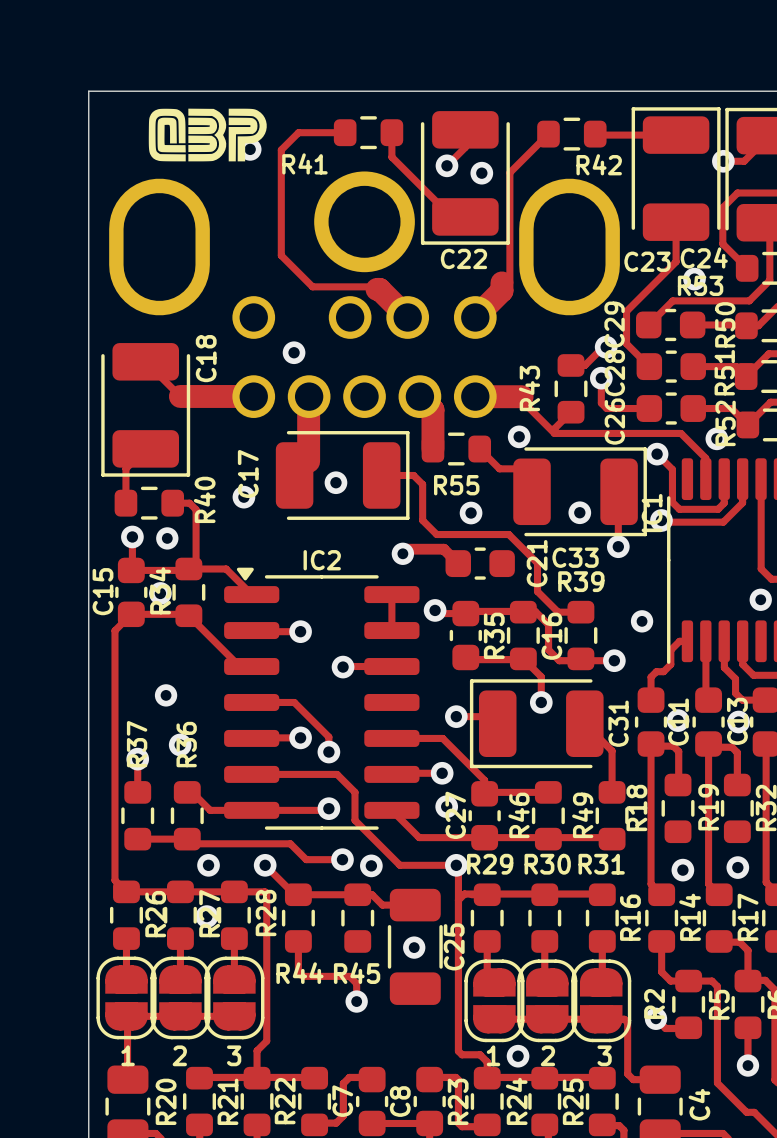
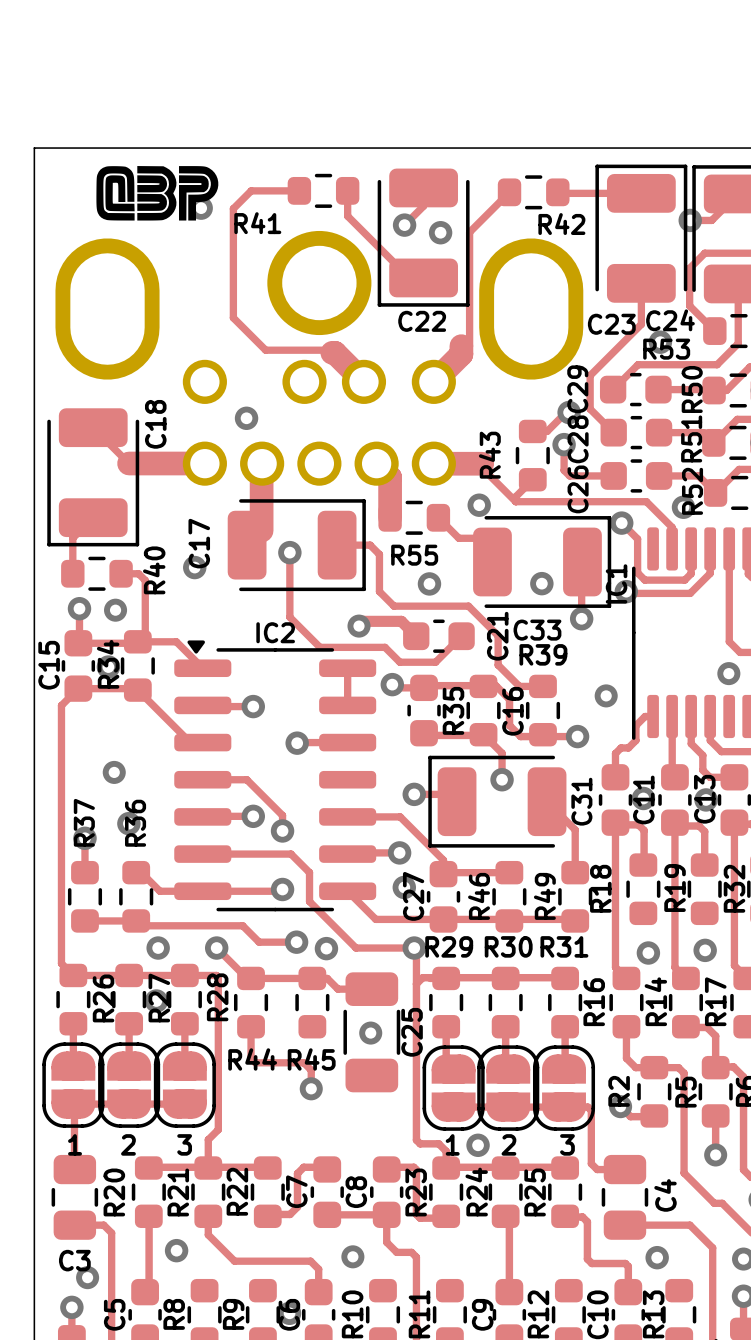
track: none -> (289, 552) (289, 617) (319, 647) (385, 647) (399, 662) (435, 662) (461, 636)

